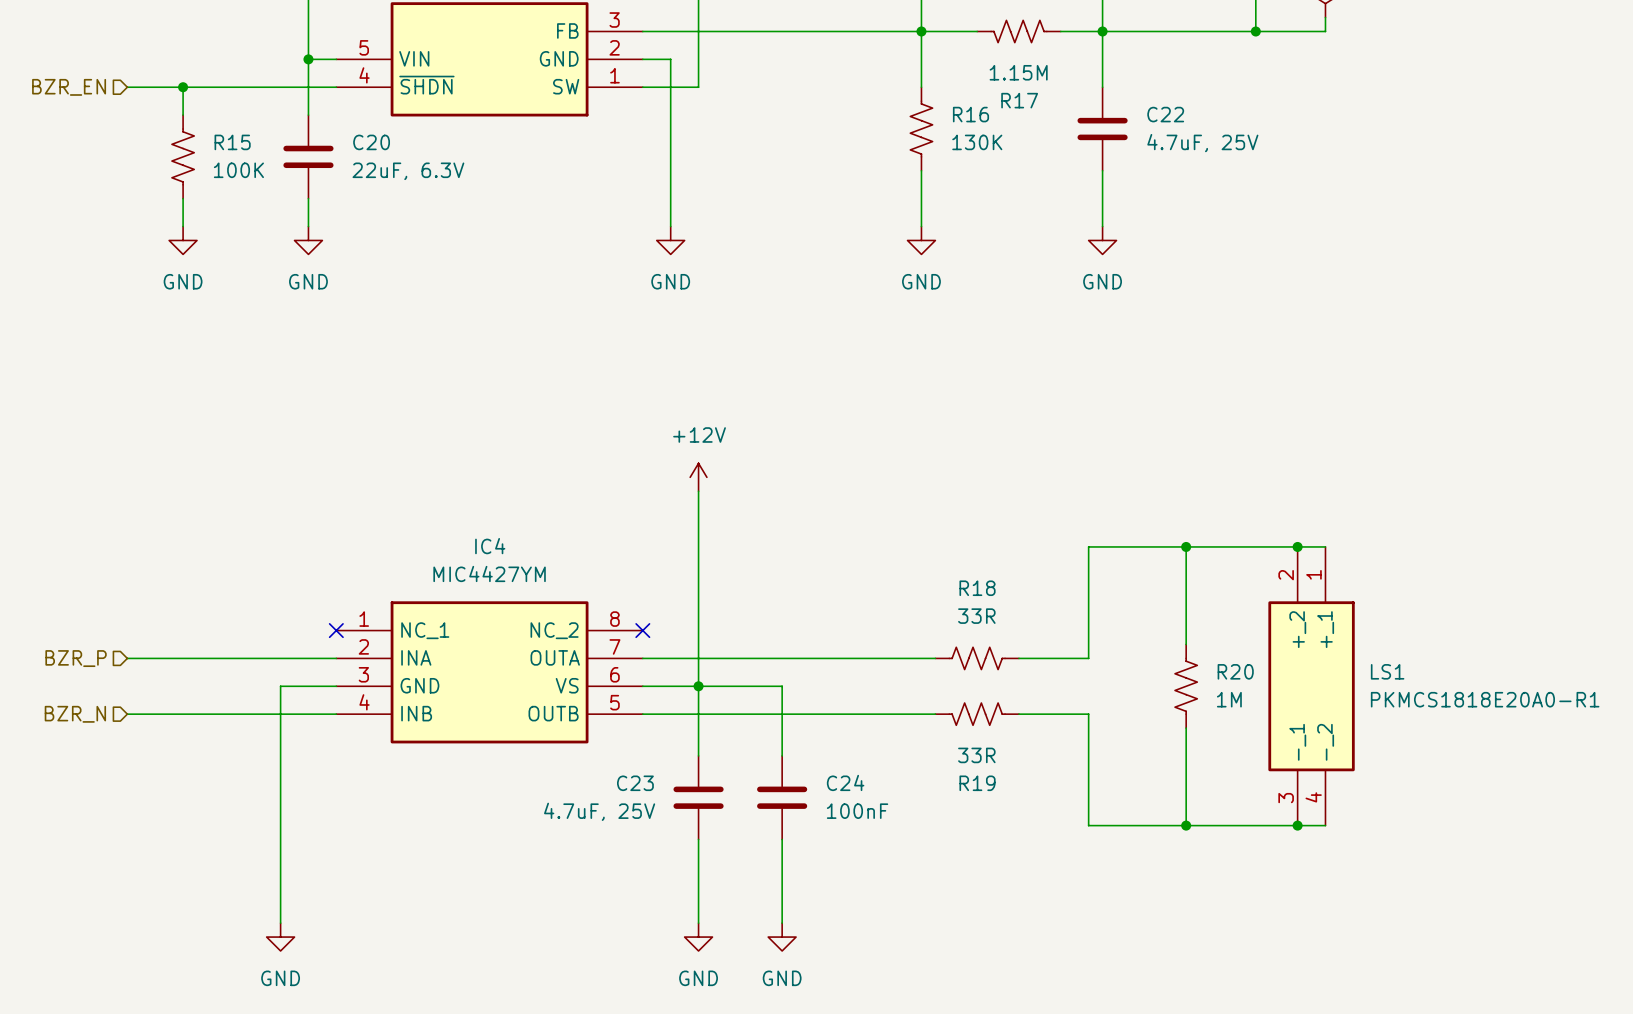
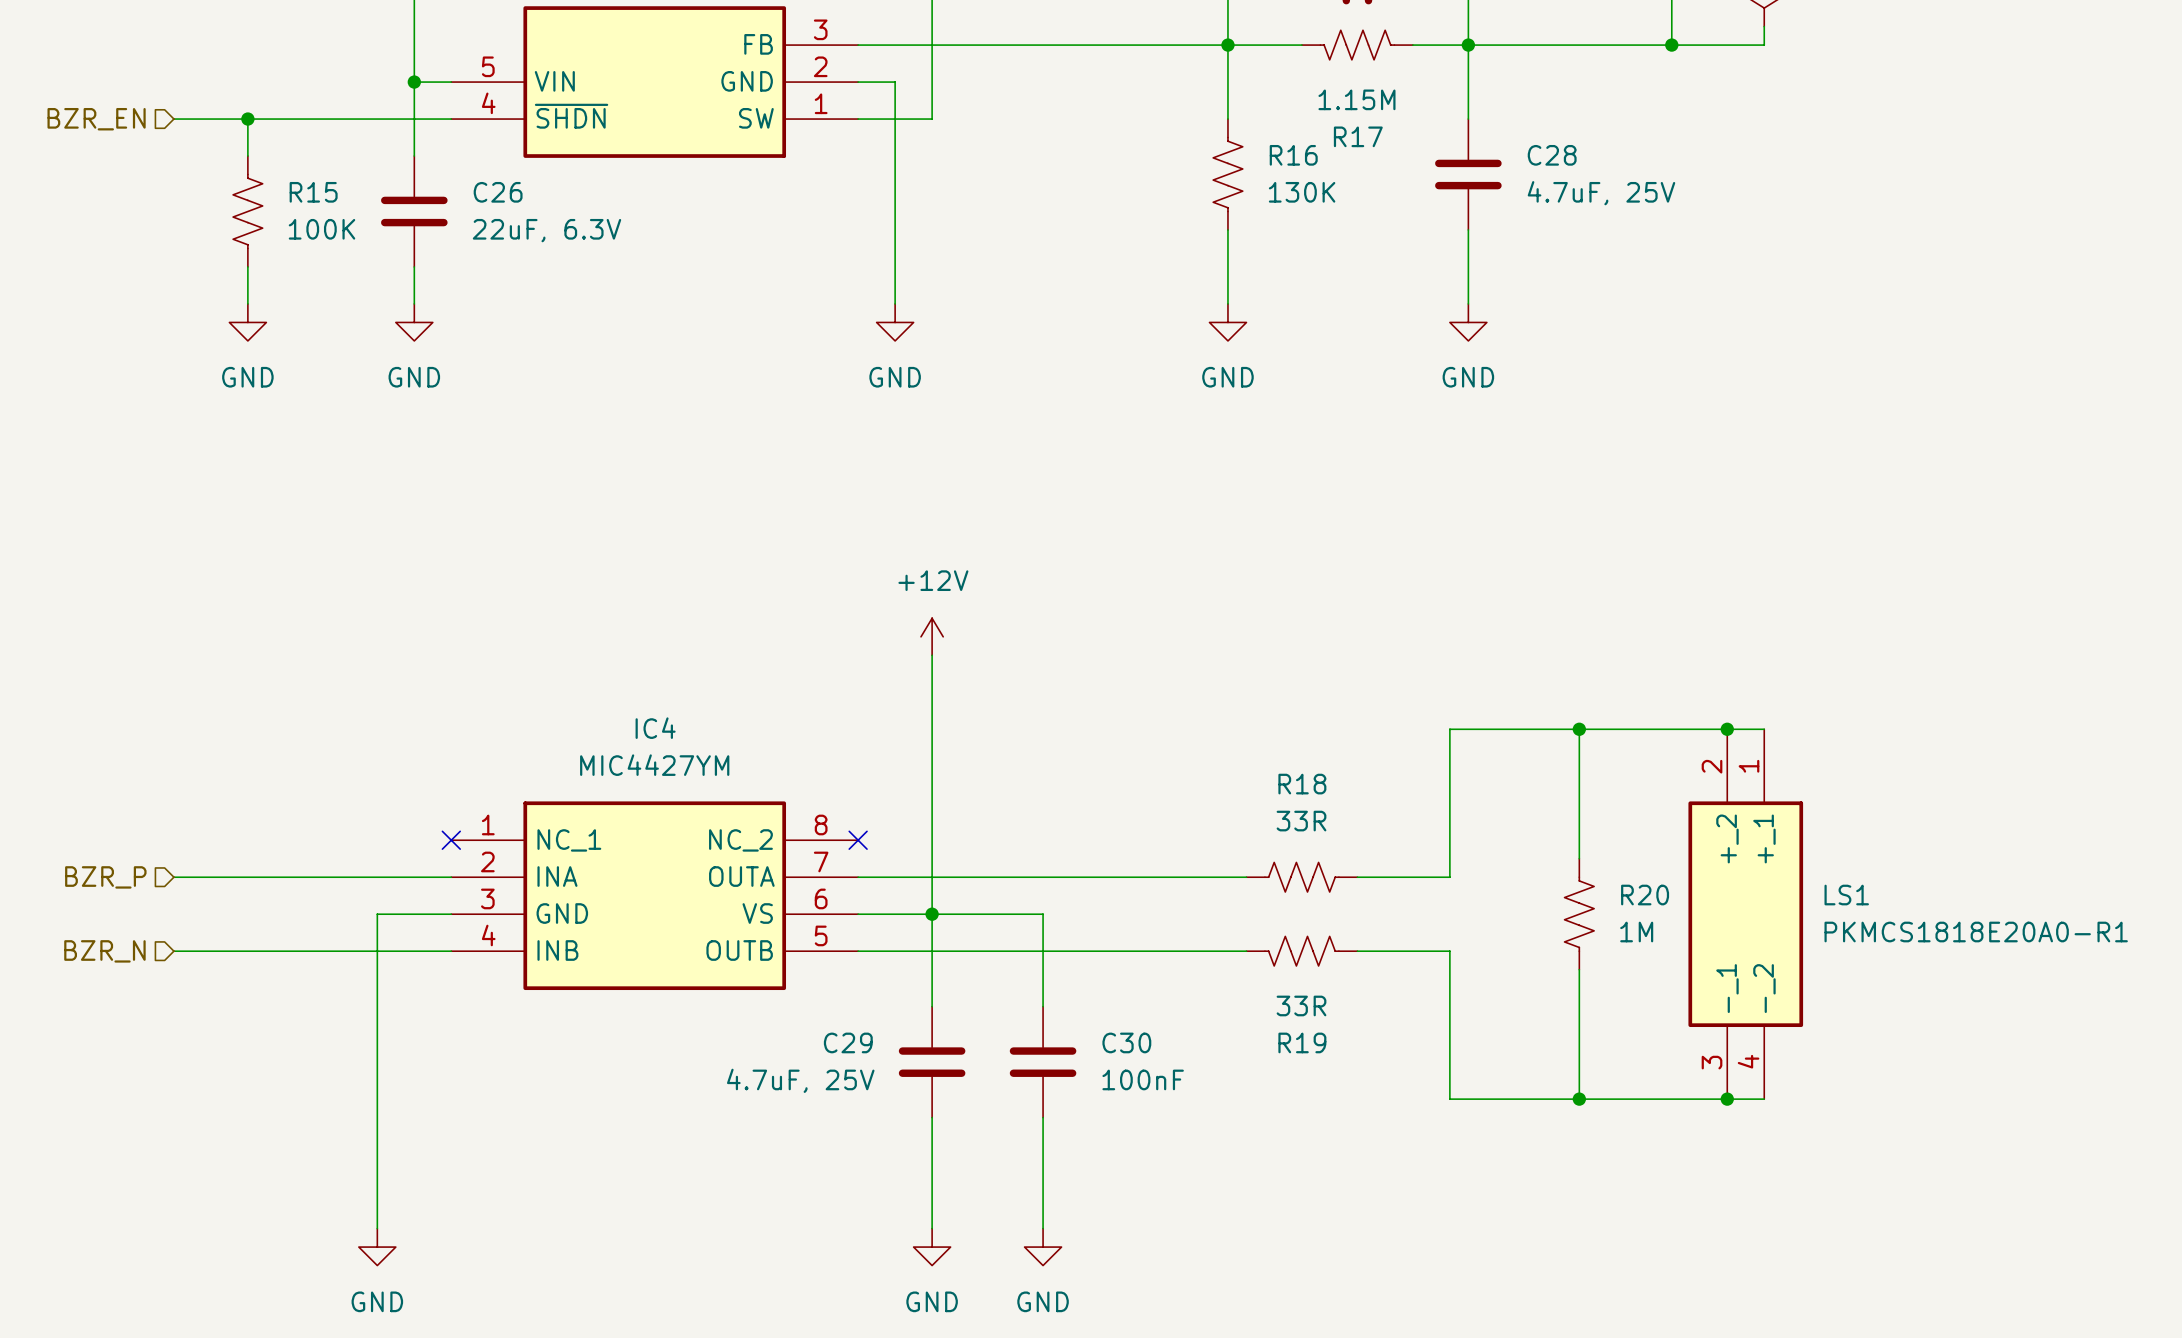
C22 name: C22 (1165, 114) -> C28 (1552, 155)
C20 name: C20 (371, 142) -> C26 (498, 192)
C24 name: C24 (845, 782) -> C30 (1126, 1042)
C23 name: C23 (635, 783) -> C29 (848, 1042)

